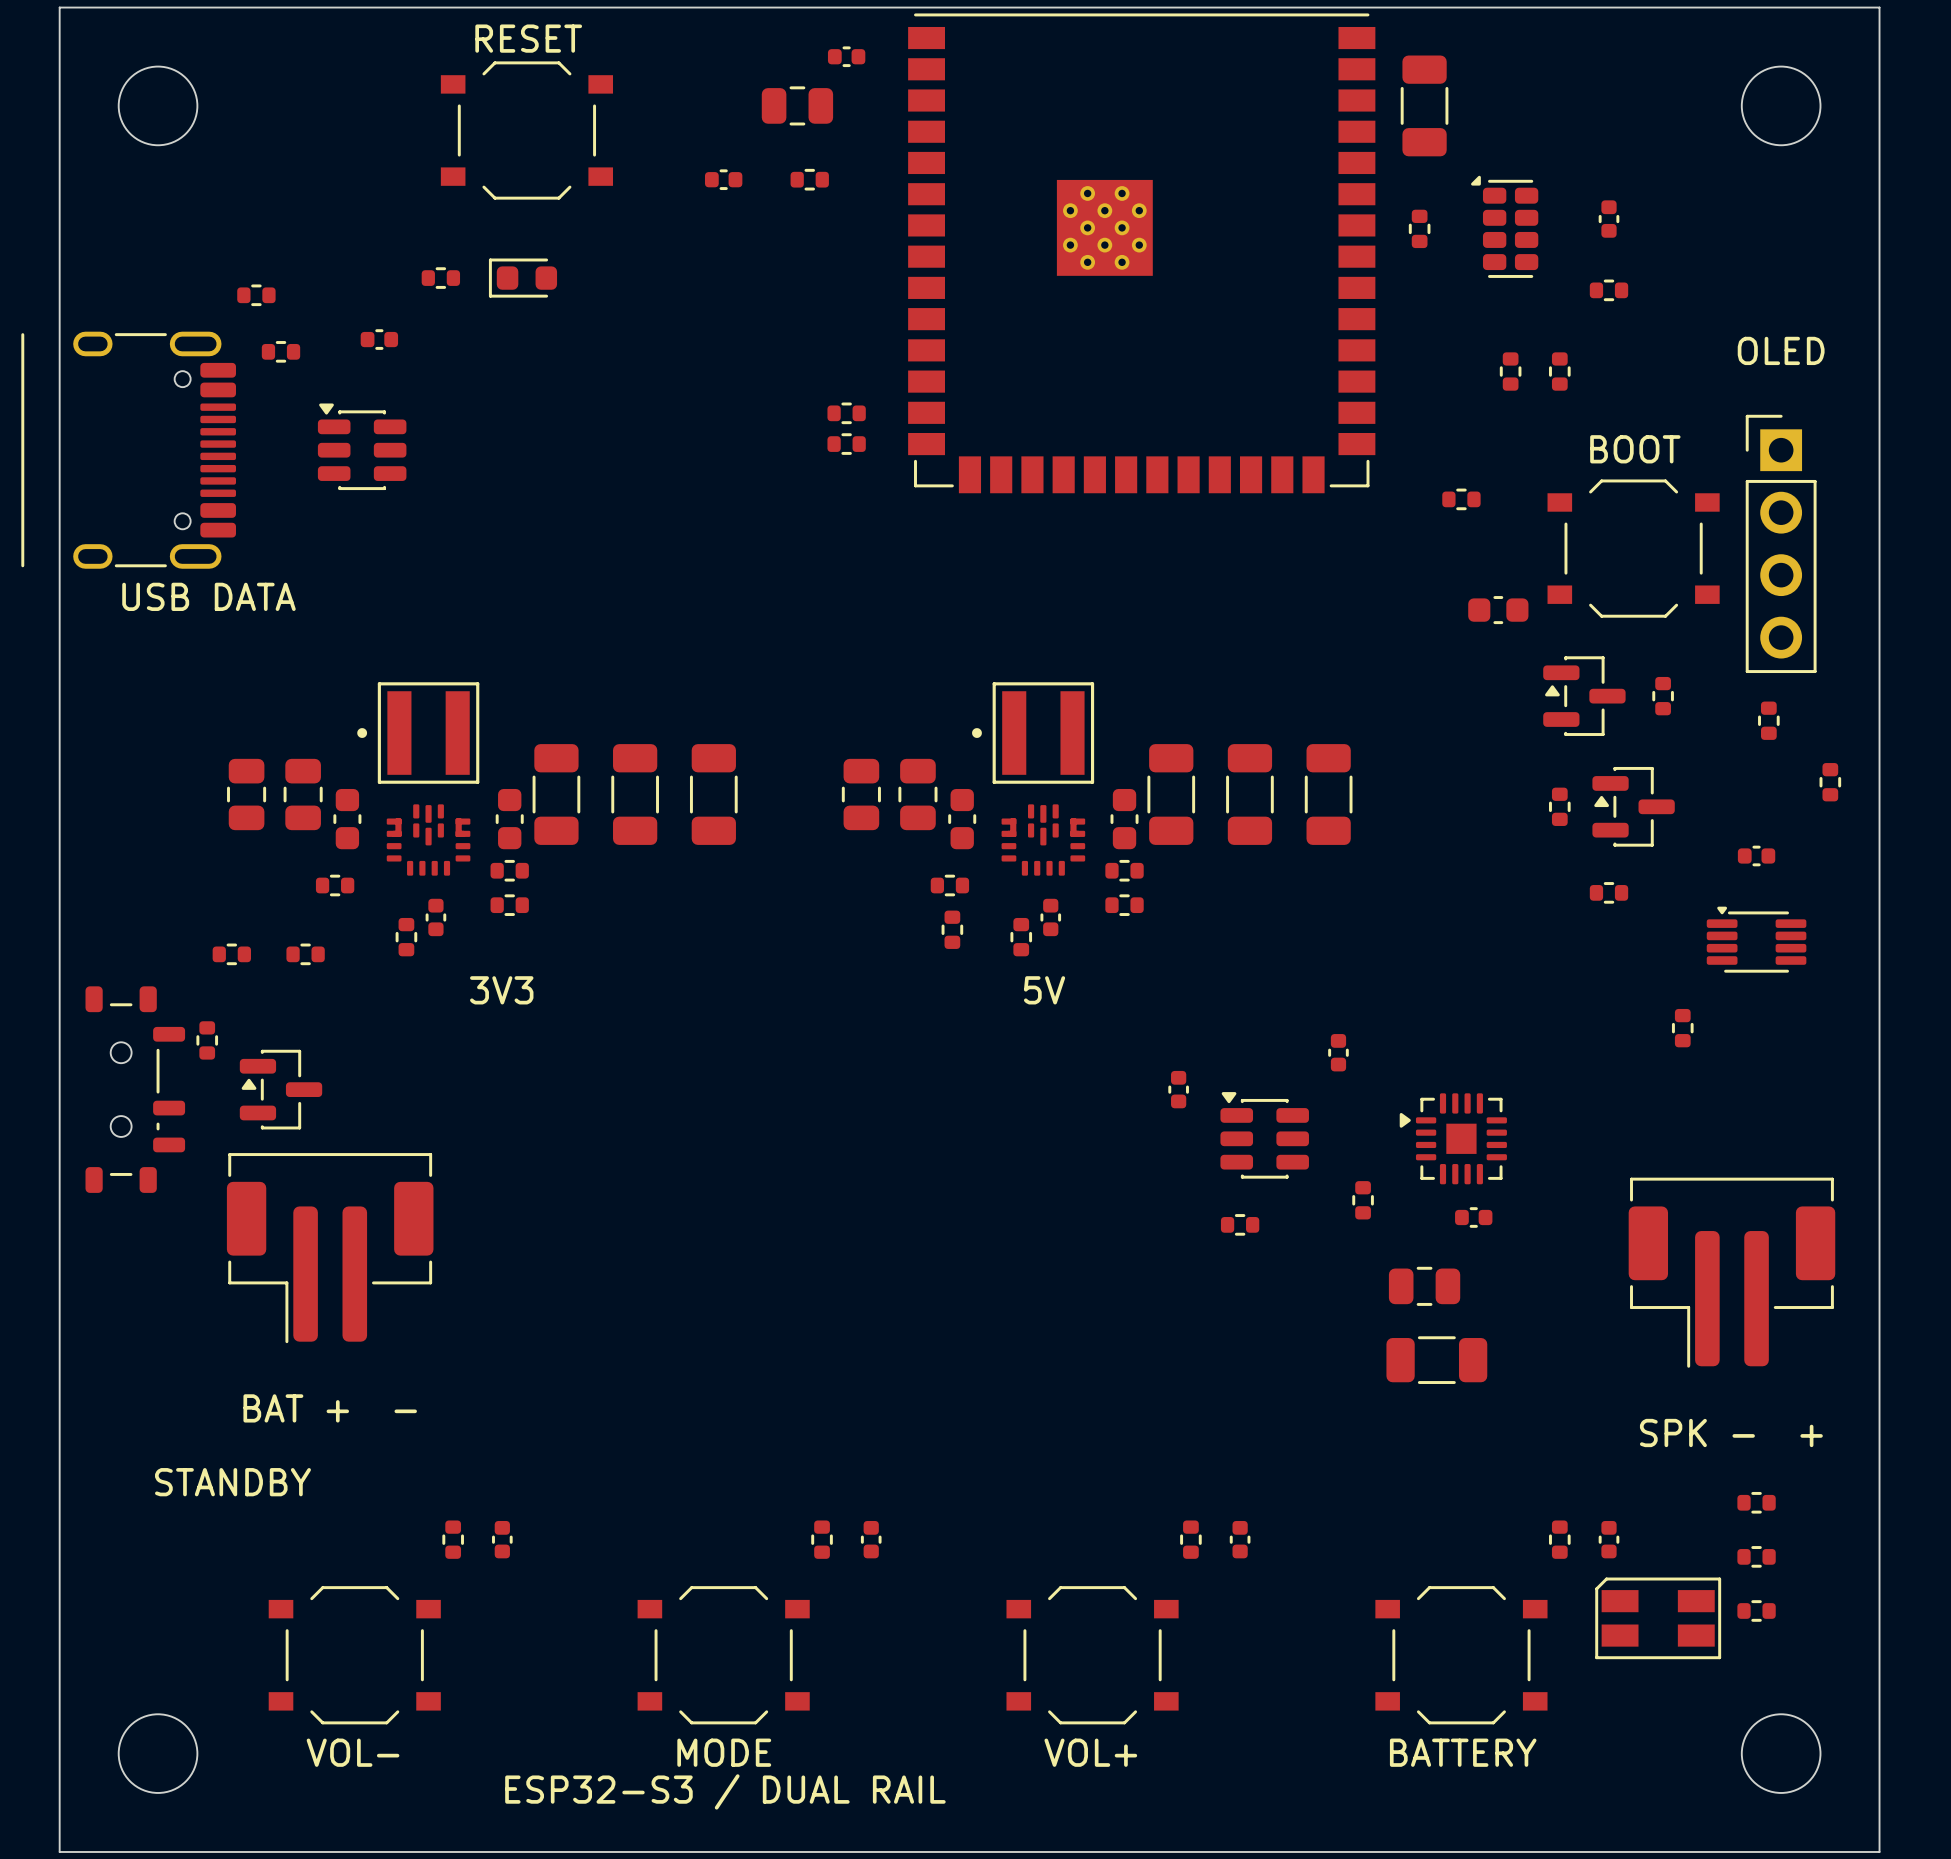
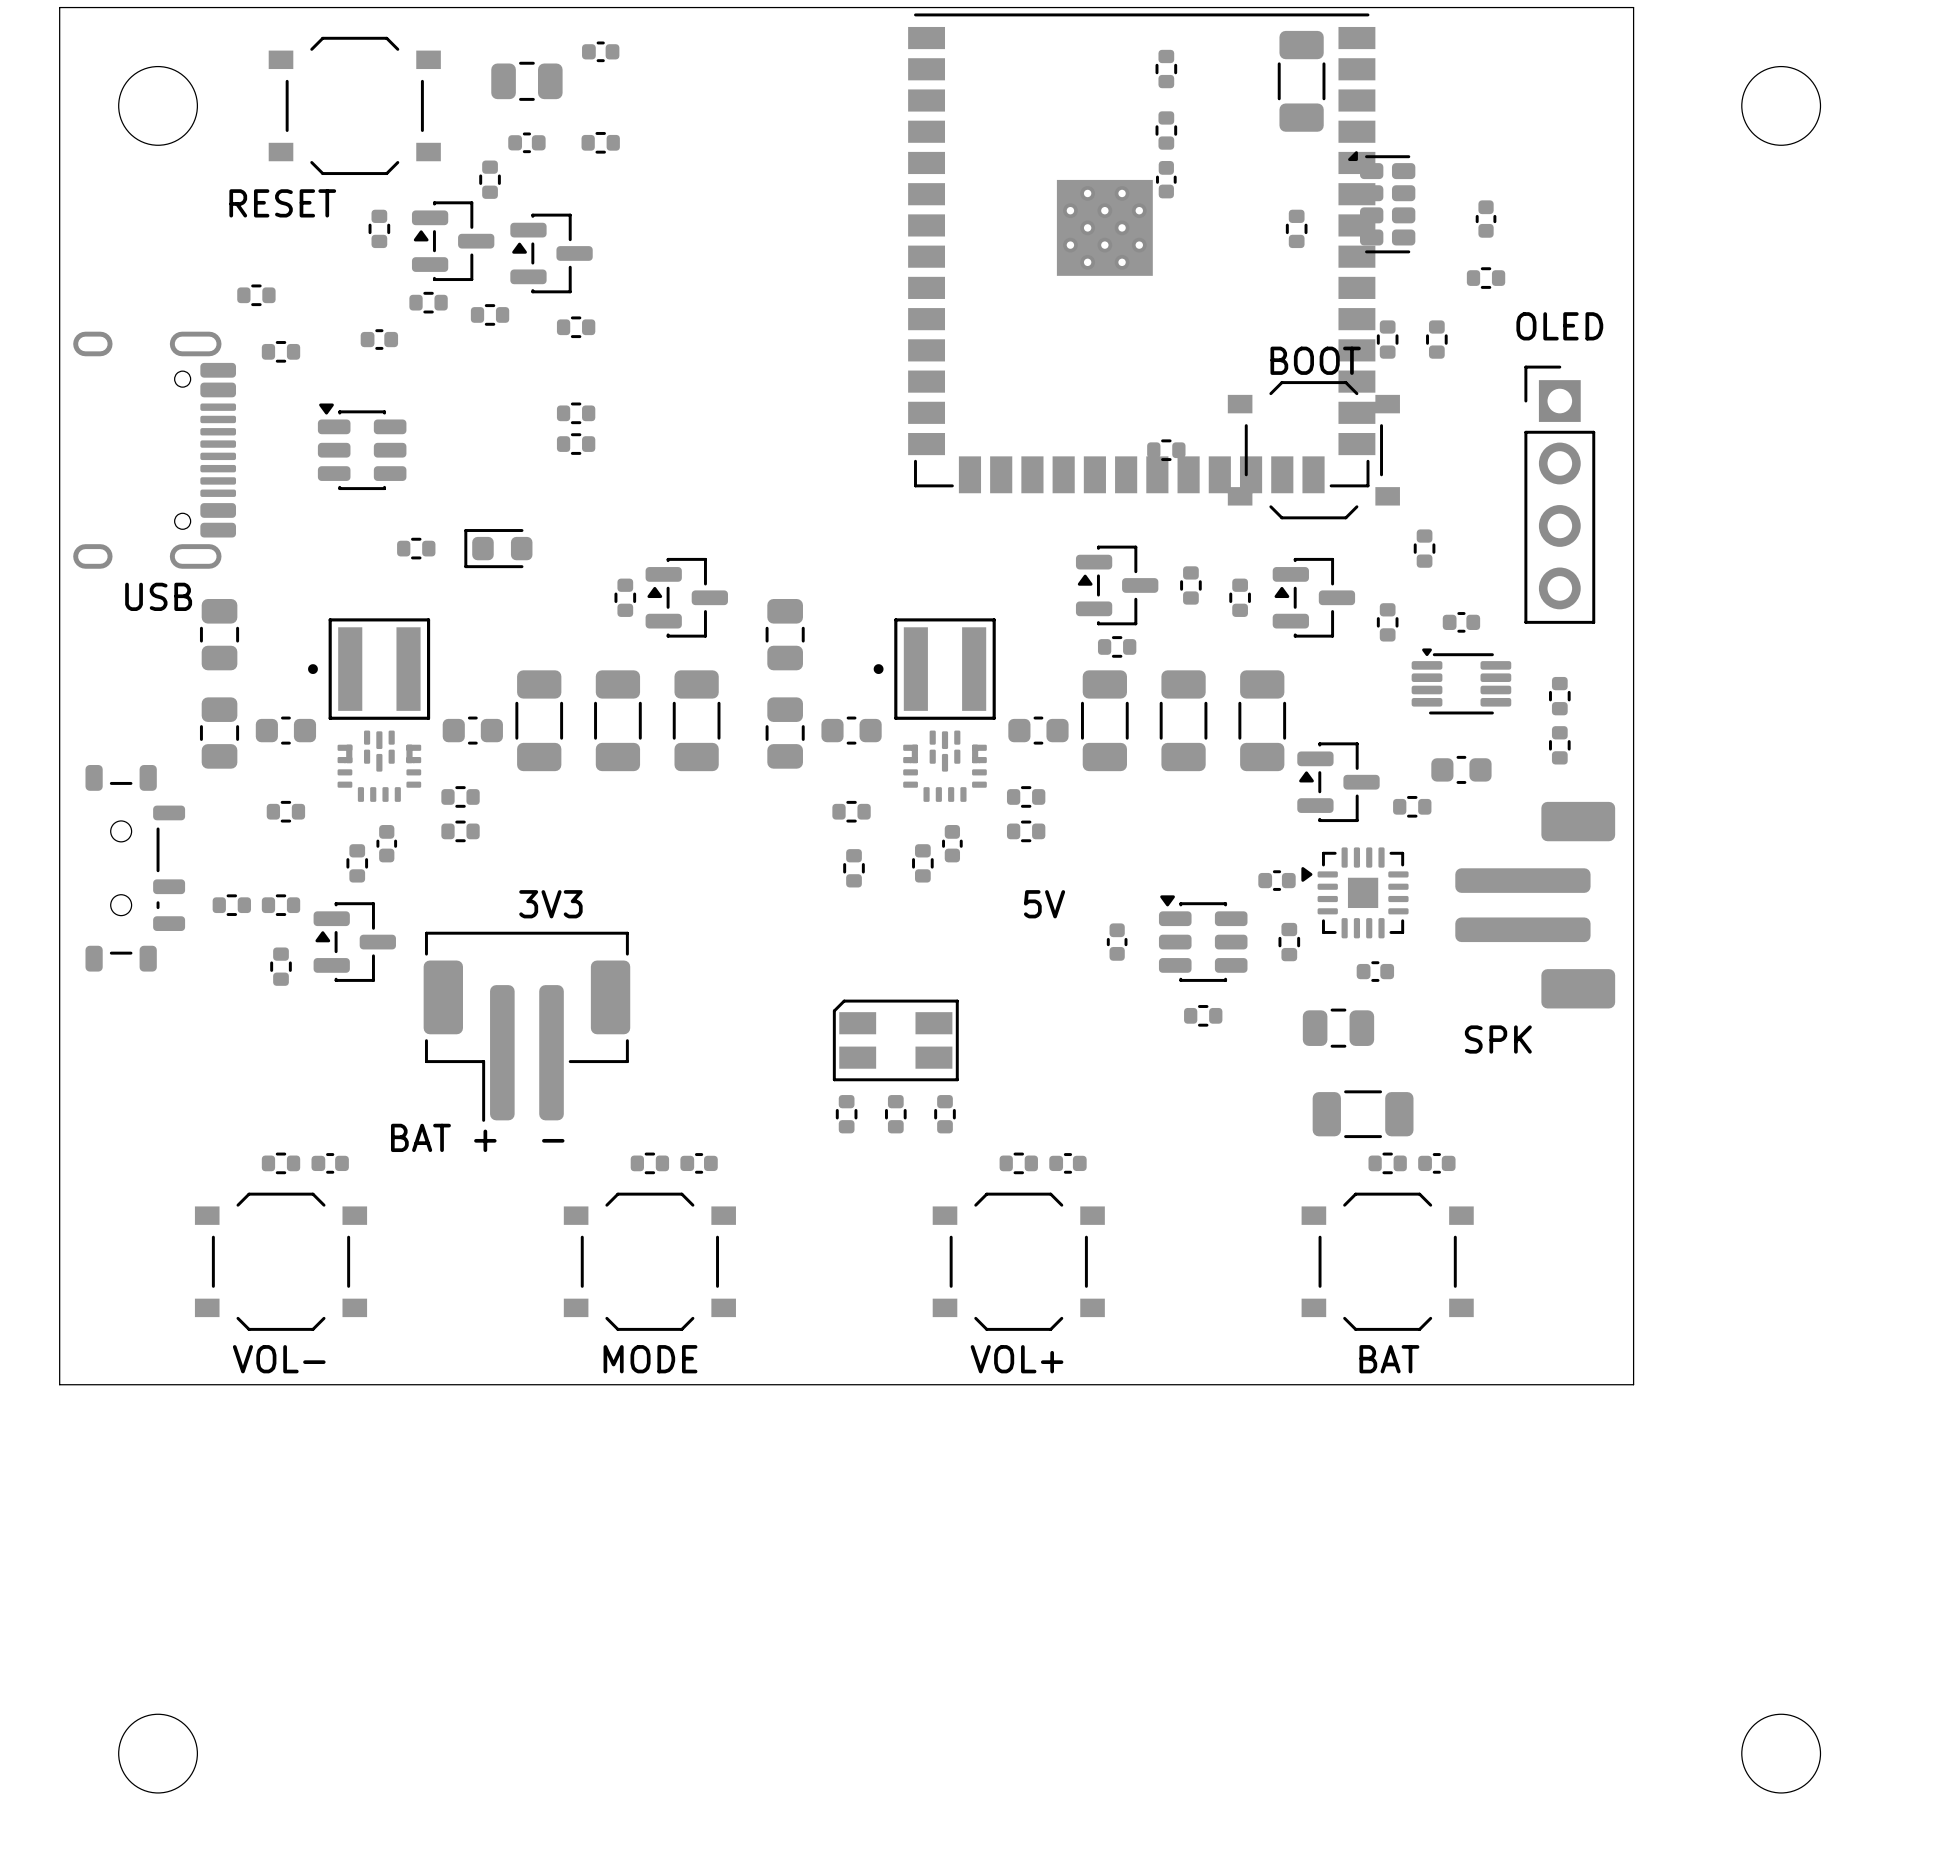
board edge: (1633, 7) (1879, 7) (1879, 1851) (59, 1851) (59, 1384) -> (1633, 7) (1633, 1384) (59, 1384)
text position: RESET (528, 38) -> RESET (282, 203)
part: none -> (600, 51)
part: (846, 56) -> none
part footprint: [440, 61, 614, 200] -> [508, 132, 546, 154]
part: none -> (1166, 69)
part: none -> (526, 81)
part: none -> (354, 105)
part: (797, 105) -> none
part position: (1424, 105) -> (1301, 81)
part: none -> (1166, 130)
part: none -> (600, 142)
part footprint: [1471, 175, 1539, 278] -> [1475, 200, 1497, 238]
part: none -> (490, 179)
part: (723, 179) -> none
part: (809, 179) -> none
part: none -> (1166, 179)
part: none -> (1381, 202)
part: (1609, 219) -> none
part: none -> (379, 228)
part: none -> (1296, 228)
part: (1419, 228) -> none
part: none -> (453, 241)
part: none -> (551, 253)
part position: (440, 278) -> (428, 302)
part position: (522, 278) -> (498, 548)
part: none -> (1486, 278)
part: (1609, 290) -> none
part: none -> (490, 314)
part: none -> (576, 327)
part: none -> (1387, 339)
part: none -> (1436, 339)
text position: OLED (1781, 350) -> OLED (1559, 326)
part: (1510, 371) -> none
part: (1559, 371) -> none
part: none -> (576, 413)
part: (846, 413) -> none
part: none -> (576, 444)
part: (846, 444) -> none
text position: BOOT (1635, 449) -> BOOT (1315, 360)
part: (128, 450) -> none
part: none -> (1166, 450)
part rotation: 0° (1461, 499) -> 90° clockwise (1424, 548)
part position: (1461, 499) -> (1424, 548)
part position: (1781, 543) -> (1559, 494)
part: none -> (416, 548)
part position: (1633, 548) -> (1313, 450)
part: none -> (1117, 585)
part: none -> (1190, 585)
text: none -> USB (158, 596)
text: USB DATA (208, 596) -> none
part: none -> (625, 597)
part: none -> (686, 597)
part: none -> (1240, 597)
part: none -> (1313, 597)
part position: (1498, 610) -> (1461, 769)
part: none -> (1387, 622)
part: none -> (1461, 622)
part: none -> (219, 634)
part: none -> (785, 634)
part: none -> (1117, 646)
part footprint: [1543, 656, 1626, 736] -> [1548, 676, 1571, 716]
part: none -> (934, 669)
part footprint: [972, 682, 1095, 784] -> [1008, 716, 1069, 745]
part: (1663, 696) -> none
part: none -> (539, 720)
part: none -> (617, 720)
part: none -> (696, 720)
part: none -> (1104, 720)
part: none -> (1183, 720)
part: none -> (1262, 720)
part: (1768, 720) -> none
part: none -> (285, 730)
part: none -> (472, 730)
part: none -> (219, 733)
part position: (418, 733) -> (369, 669)
part: none -> (785, 733)
part footprint: [1304, 744, 1353, 845] -> [1297, 742, 1380, 823]
part: none -> (1559, 745)
part footprint: [841, 758, 881, 831] -> [832, 800, 871, 823]
part: none -> (945, 766)
part: (1830, 782) -> none
part: (246, 794) -> none
part: (303, 794) -> none
part: (556, 794) -> none
part: (635, 794) -> none
part: (713, 794) -> none
part: (917, 794) -> none
part: (1171, 794) -> none
part: (1249, 794) -> none
part: none -> (460, 796)
part: none -> (1026, 796)
part footprint: [1001, 804, 1086, 876] -> [1006, 820, 1046, 843]
part: none -> (1412, 806)
part: (1559, 806) -> none
part: (1633, 806) -> none
part: none -> (285, 811)
part: (347, 819) -> none
part: (509, 819) -> none
part rotation: 0° (962, 819) -> 90° clockwise (851, 730)
part position: (962, 819) -> (851, 730)
part: (1124, 819) -> none
part: none -> (460, 831)
part position: (428, 840) -> (379, 766)
part: none -> (952, 843)
part: (1756, 855) -> none
part: none -> (357, 863)
part: none -> (854, 868)
part: (509, 870) -> none
part: (1124, 870) -> none
part: none -> (1277, 880)
part: (335, 885) -> none
part rotation: 0° (949, 885) -> 90° clockwise (922, 863)
part position: (949, 885) -> (922, 863)
part: (1609, 892) -> none
part: none -> (231, 905)
part: none -> (281, 905)
part: (509, 905) -> none
part: (1124, 905) -> none
part: none -> (1535, 905)
part position: (435, 917) -> (386, 843)
part: (1050, 917) -> none
part: (952, 929) -> none
part: (406, 937) -> none
part: (1021, 937) -> none
part position: (1756, 939) -> (1461, 681)
part: none -> (1117, 942)
part: none -> (1289, 942)
part: (231, 954) -> none
part: (305, 954) -> none
part: none -> (281, 966)
part: none -> (1375, 971)
text position: 3V3 (501, 990) -> 3V3 (550, 904)
text position: 5V (1044, 990) -> 5V (1044, 904)
part: none -> (1203, 1015)
part: (1682, 1028) -> none
part footprint: [1328, 1034, 1349, 1072] -> [1302, 1008, 1375, 1048]
text: none -> SPK (1498, 1039)
part: (207, 1040) -> none
part: none -> (895, 1040)
part position: (135, 1089) -> (135, 868)
part position: (281, 1089) -> (354, 942)
part: (1178, 1089) -> none
part: none -> (846, 1114)
part: none -> (895, 1114)
part: none -> (945, 1114)
part: none -> (1363, 1114)
part position: (1264, 1135) -> (1203, 938)
part position: (1453, 1138) -> (1354, 892)
part: none -> (281, 1163)
part: none -> (330, 1163)
part: none -> (649, 1163)
part: none -> (699, 1163)
part: none -> (1018, 1163)
part: none -> (1067, 1163)
part rotation: 0° (1363, 1200) -> 90° clockwise (1387, 1163)
part position: (1363, 1200) -> (1387, 1163)
part position: (1473, 1217) -> (1436, 1163)
part: (1240, 1224) -> none
part position: (330, 1248) -> (526, 1026)
part: none -> (281, 1261)
part: none -> (649, 1261)
part: none -> (1018, 1261)
part: none -> (1387, 1261)
part: (1731, 1272) -> none
part: (1424, 1286) -> none
text: none -> BAT (1389, 1359)
part: (1436, 1360) -> none
text position: BAT + - (330, 1408) -> BAT + - (477, 1137)
text: SPK - + (1731, 1432) -> none
text: STANDBY (232, 1482) -> none
part: (1756, 1502) -> none
part: (453, 1539) -> none
part: (502, 1539) -> none
part: (822, 1539) -> none
part: (871, 1539) -> none
part: (1190, 1539) -> none
part: (1240, 1539) -> none
part: (1559, 1539) -> none
part: (1609, 1539) -> none
part: (1756, 1556) -> none
part: (1756, 1610) -> none
part: (1658, 1618) -> none
part: (354, 1655) -> none
part: (723, 1655) -> none
part: (1092, 1655) -> none
part: (1461, 1655) -> none
text position: VOL- (353, 1752) -> VOL- (279, 1359)
text position: MODE (724, 1752) -> MODE (650, 1359)
text position: VOL+ (1090, 1752) -> VOL+ (1017, 1359)
text: BATTERY (1463, 1752) -> none
text: ESP32-S3 / DUAL RAIL (725, 1791) -> none

